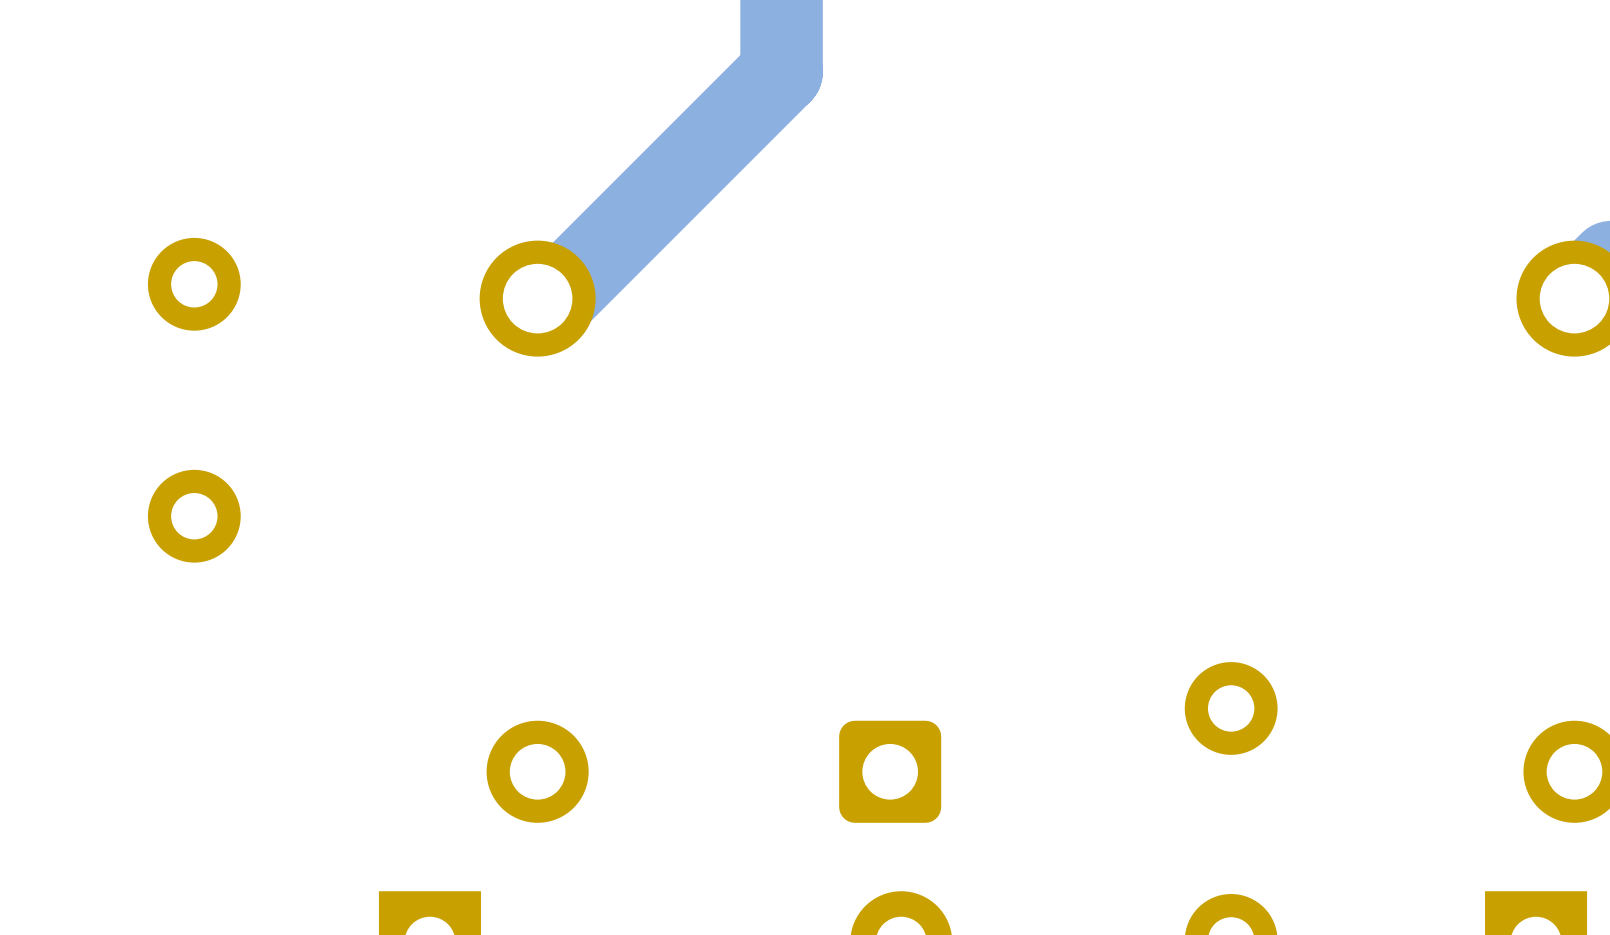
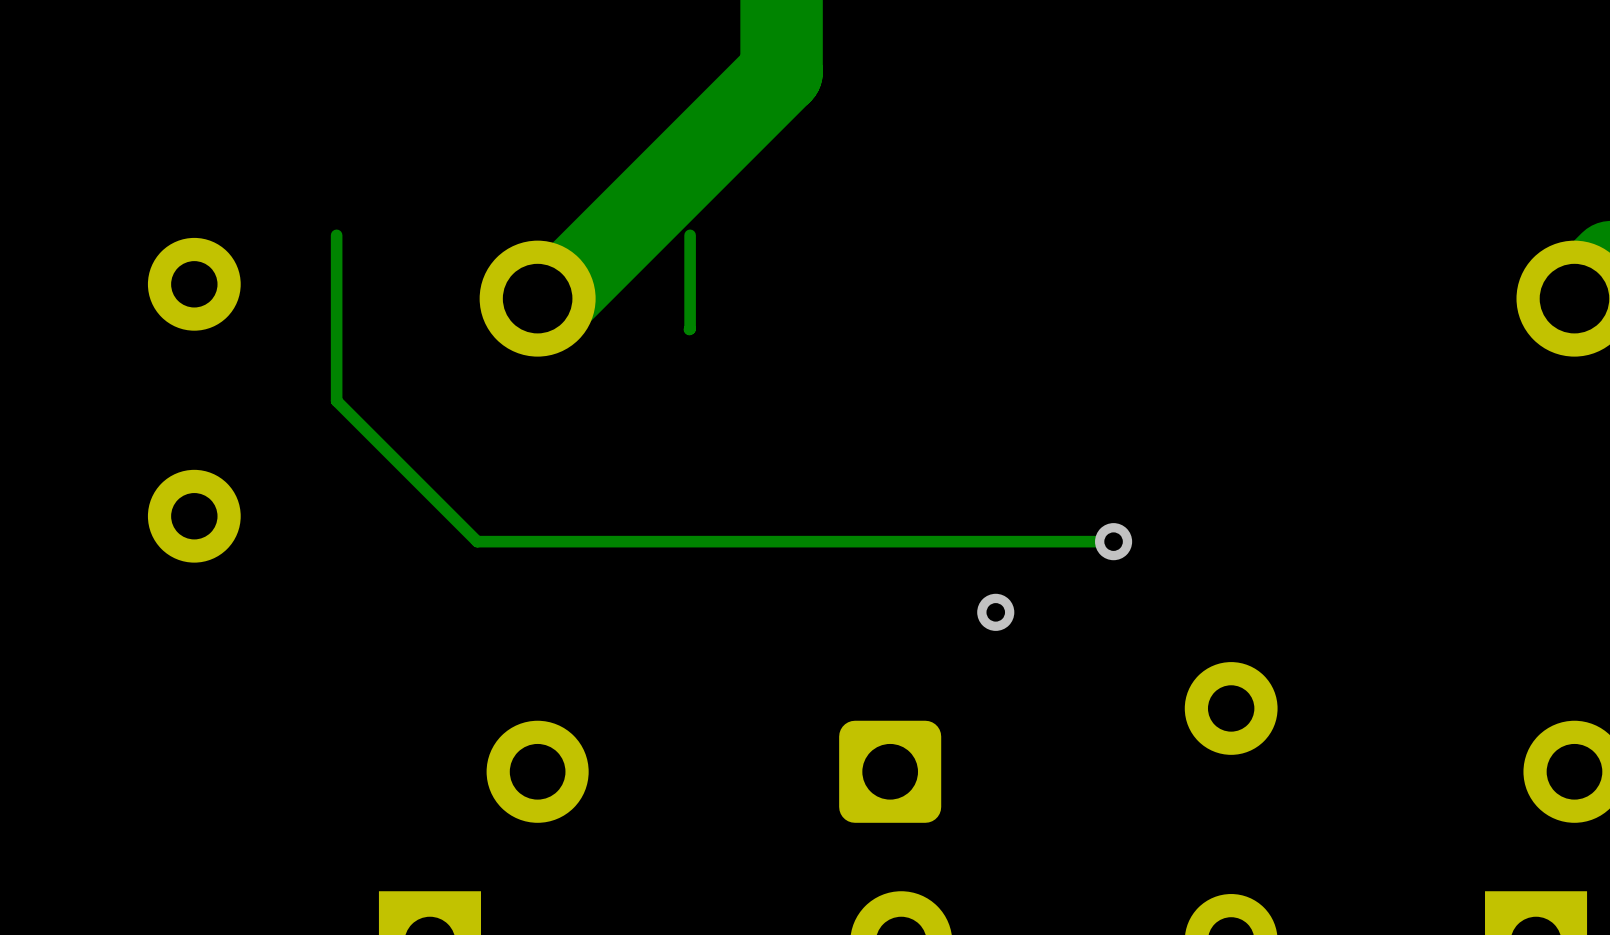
track: none -> (336, 235) (336, 400) (477, 541) (1113, 541)
track: none -> (690, 235) (689, 329)
via: none -> (1113, 541)
via: none -> (995, 612)

